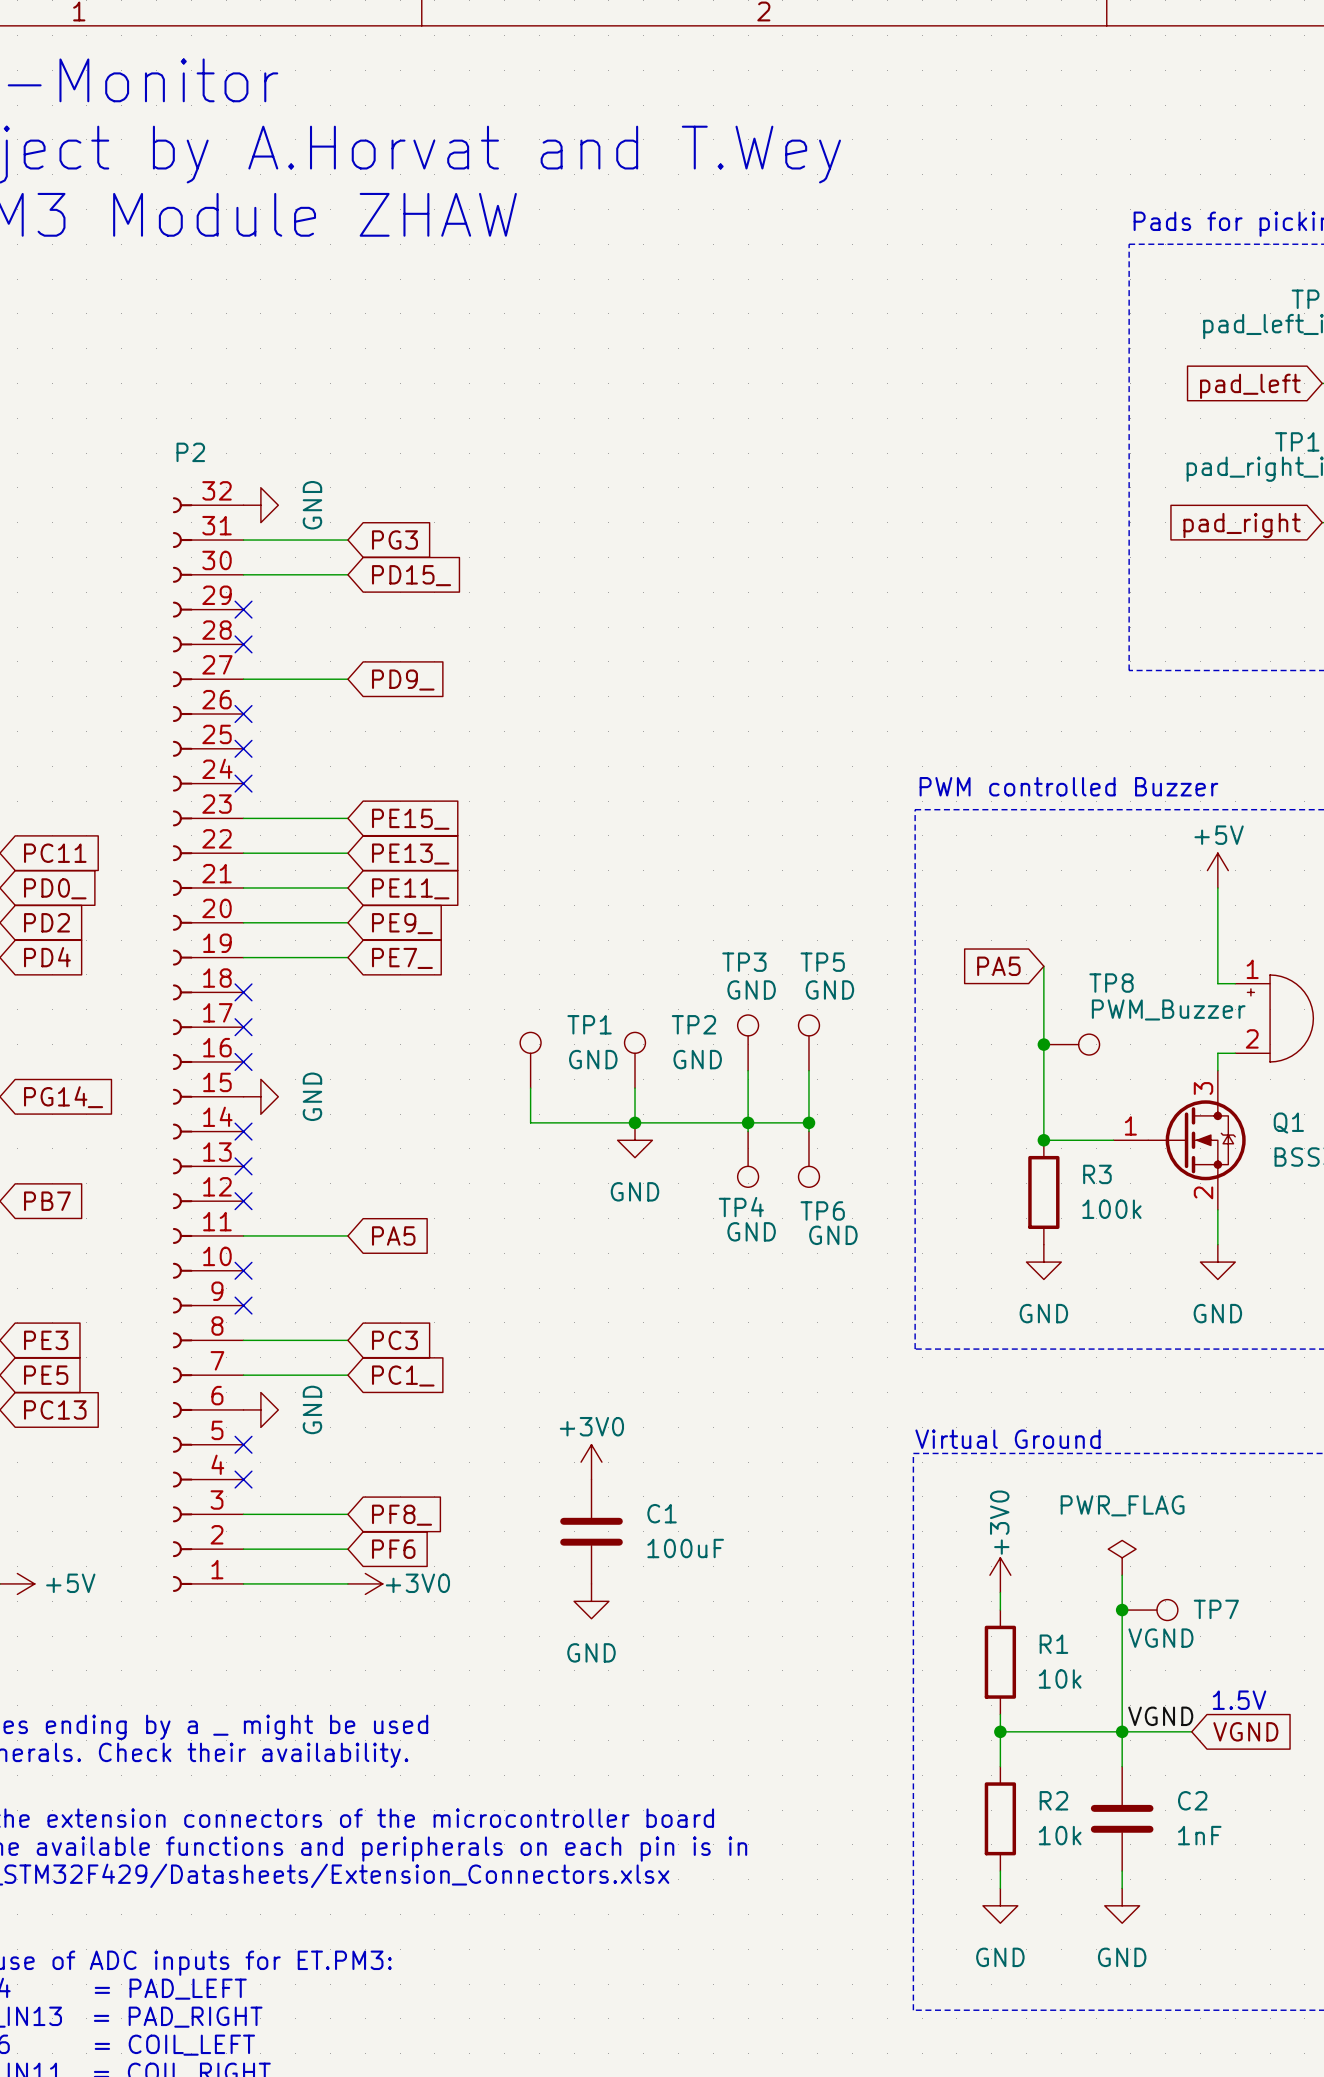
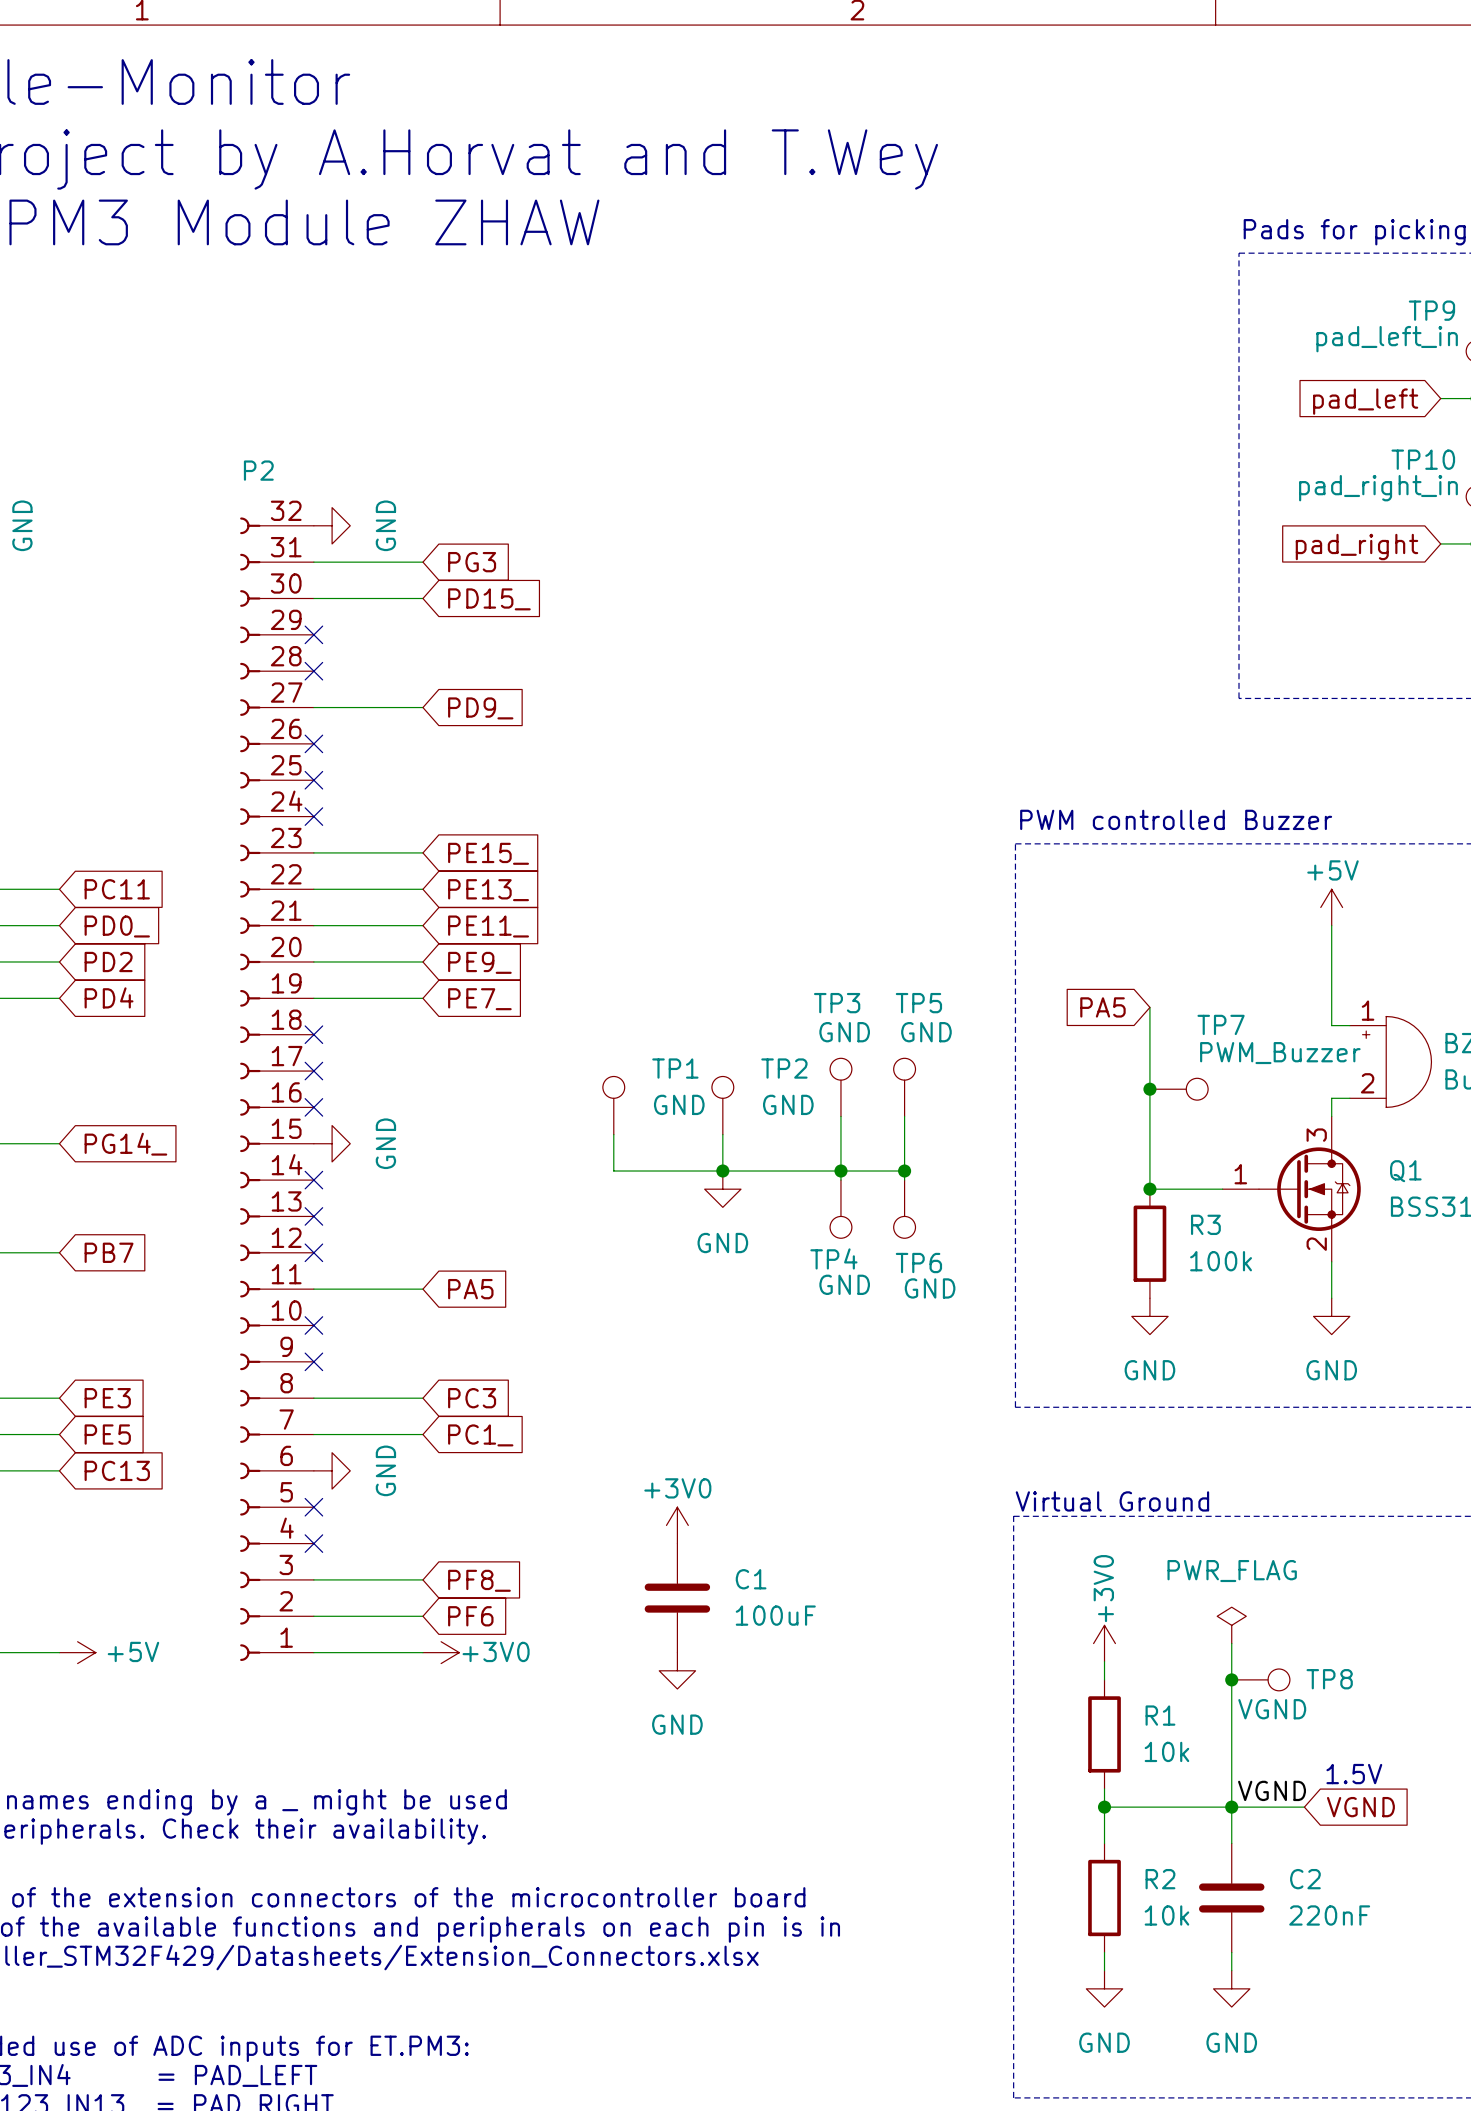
TP8 name: TP8 (1111, 983) -> TP7 (1221, 1024)
TP7 name: TP7 (1216, 1609) -> TP8 (1329, 1679)
C2 value: 1nF (1199, 1835) -> 220nF (1329, 1915)

